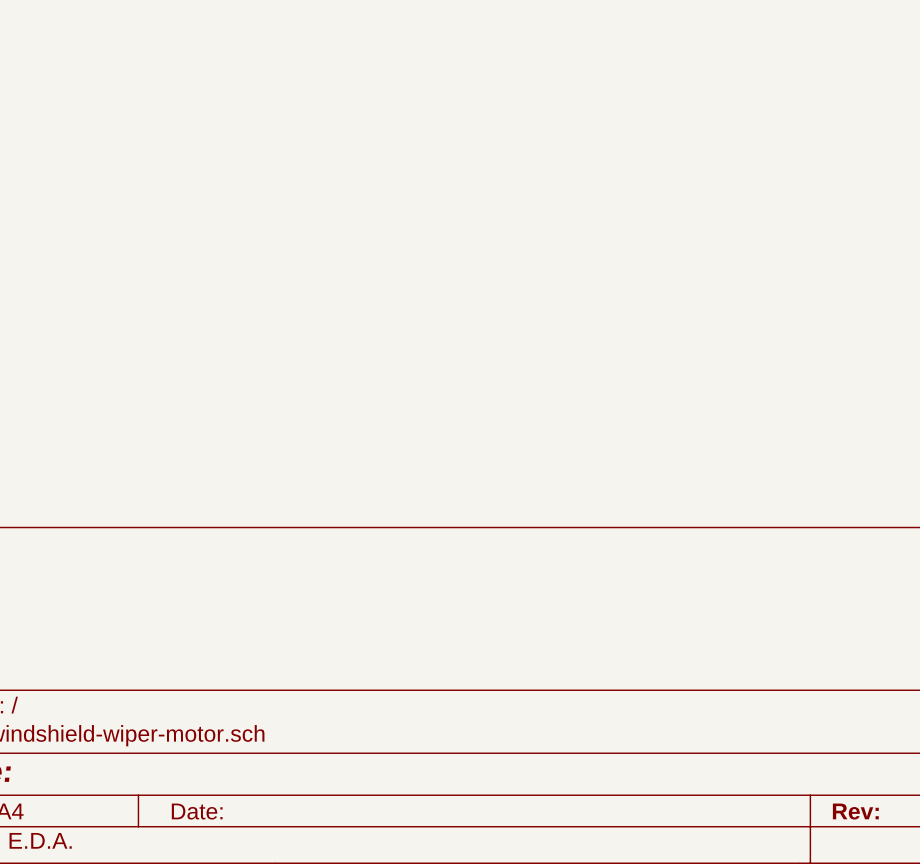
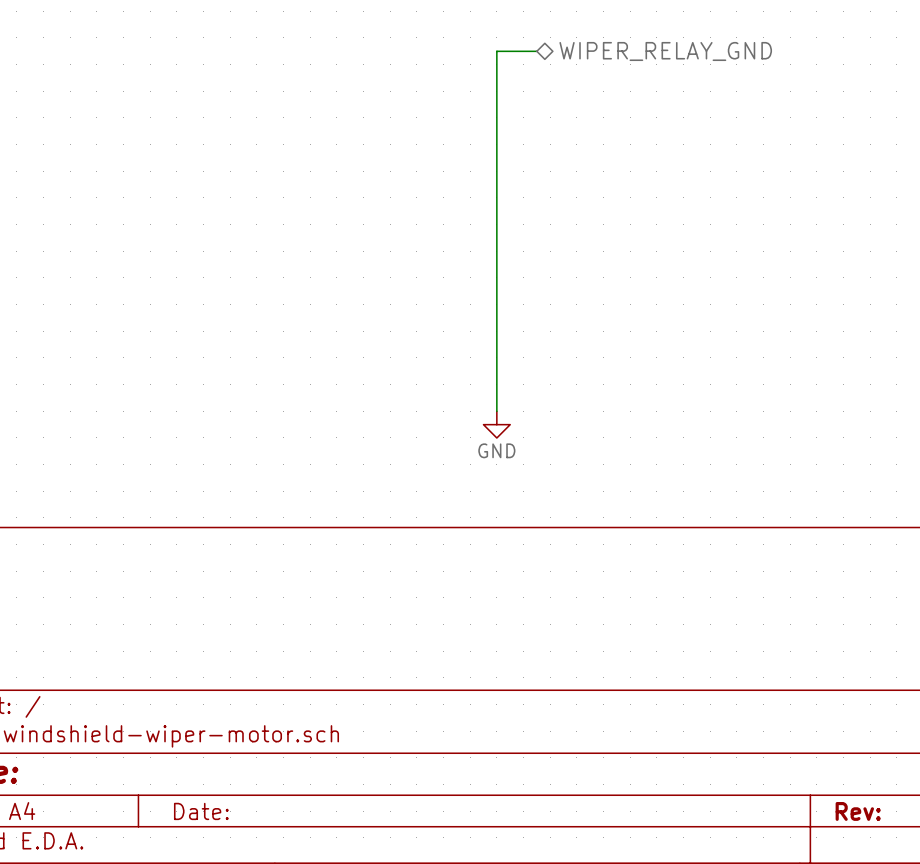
wire: none -> (536, 51) (496, 51) (496, 411)
hierarchical label: none -> WIPER_RELAY_GND (665, 51)
power symbol: none -> GND (496, 424)

